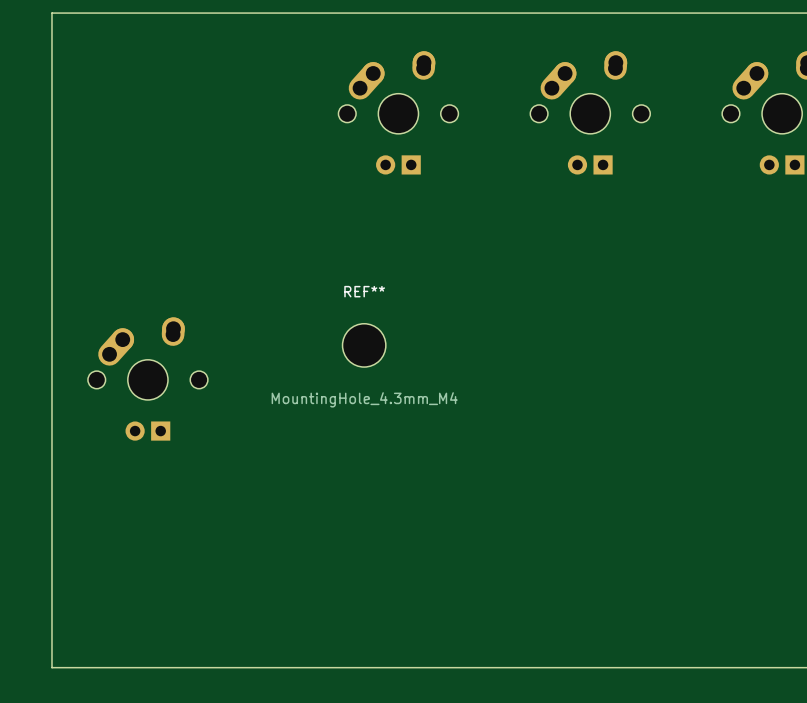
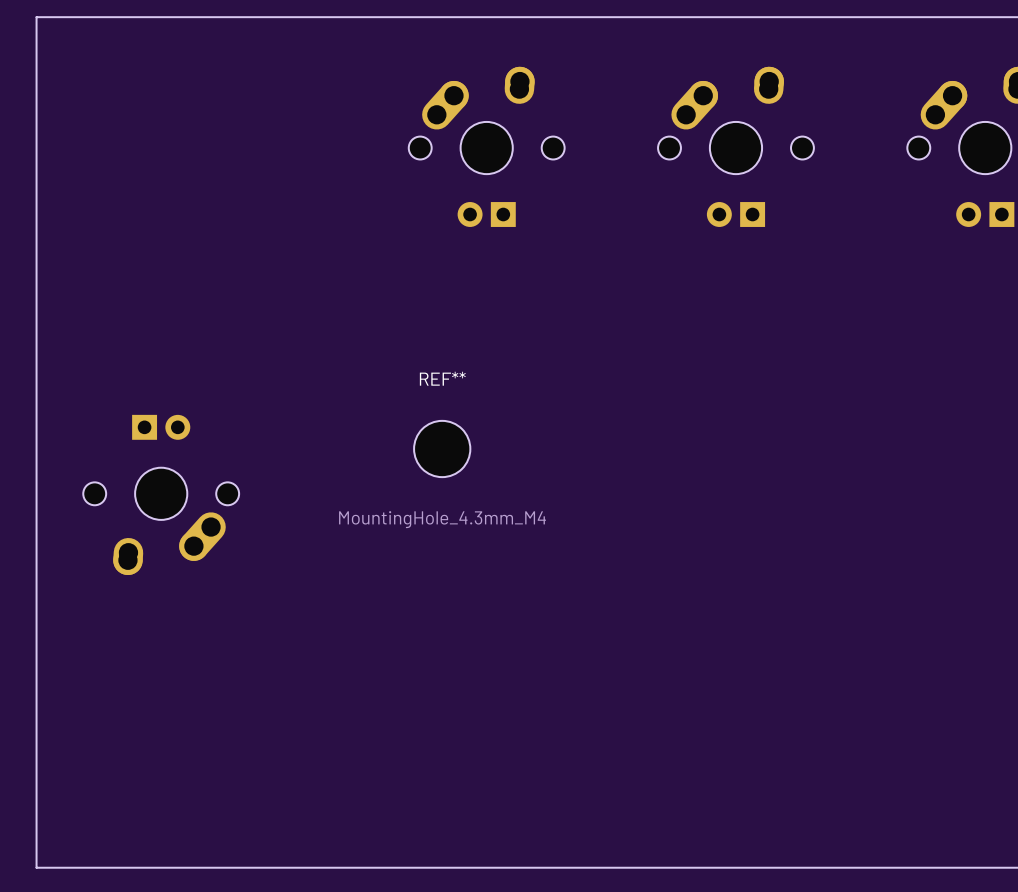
part rotation: 0° (147, 379) -> 180° (161, 494)

